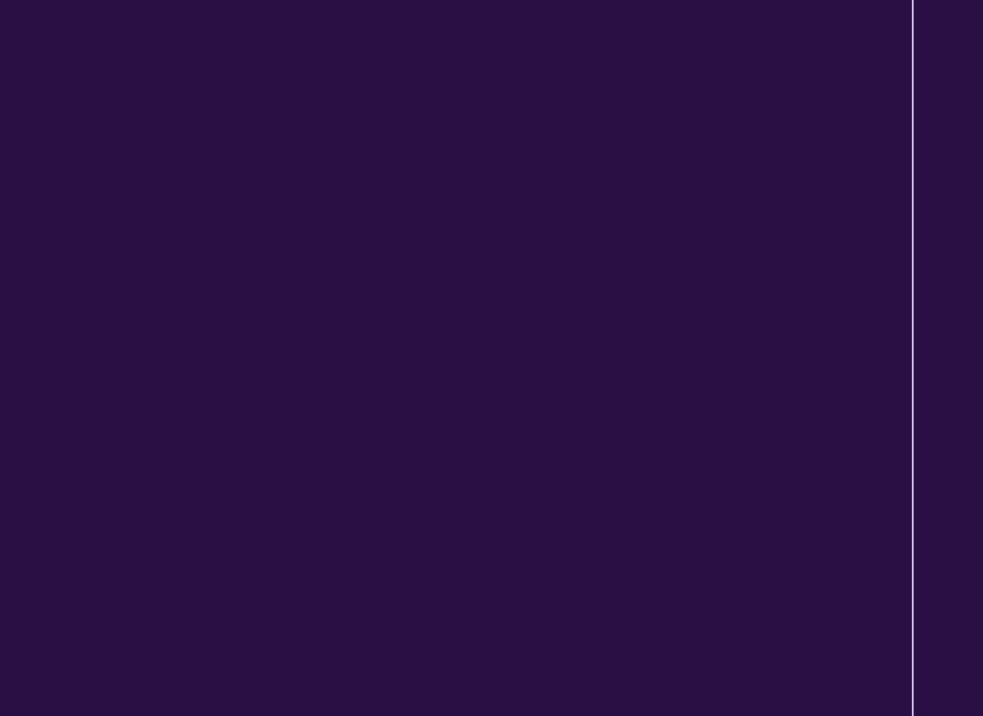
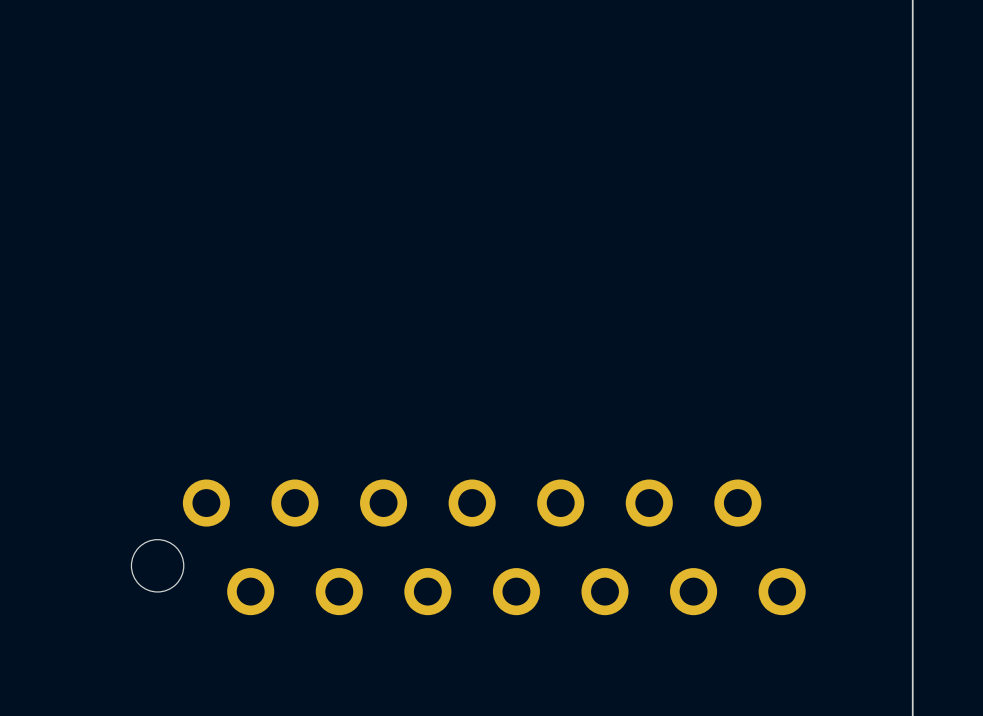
part: none -> (468, 547)

